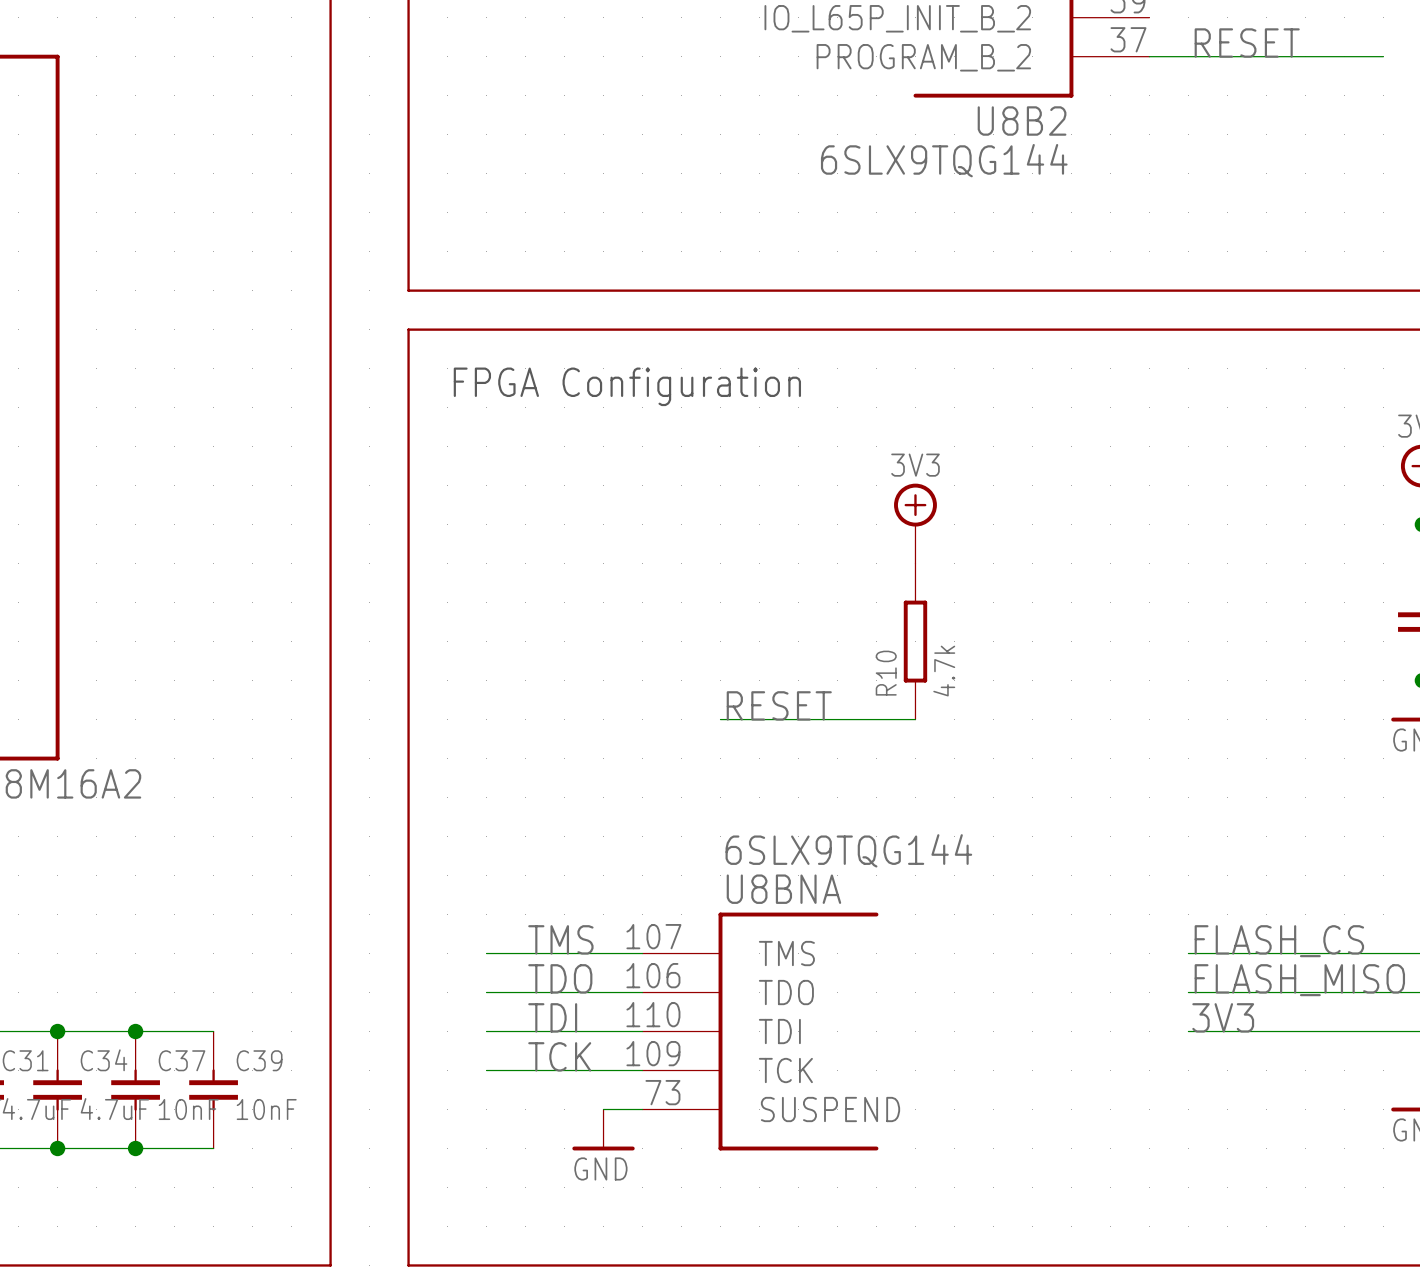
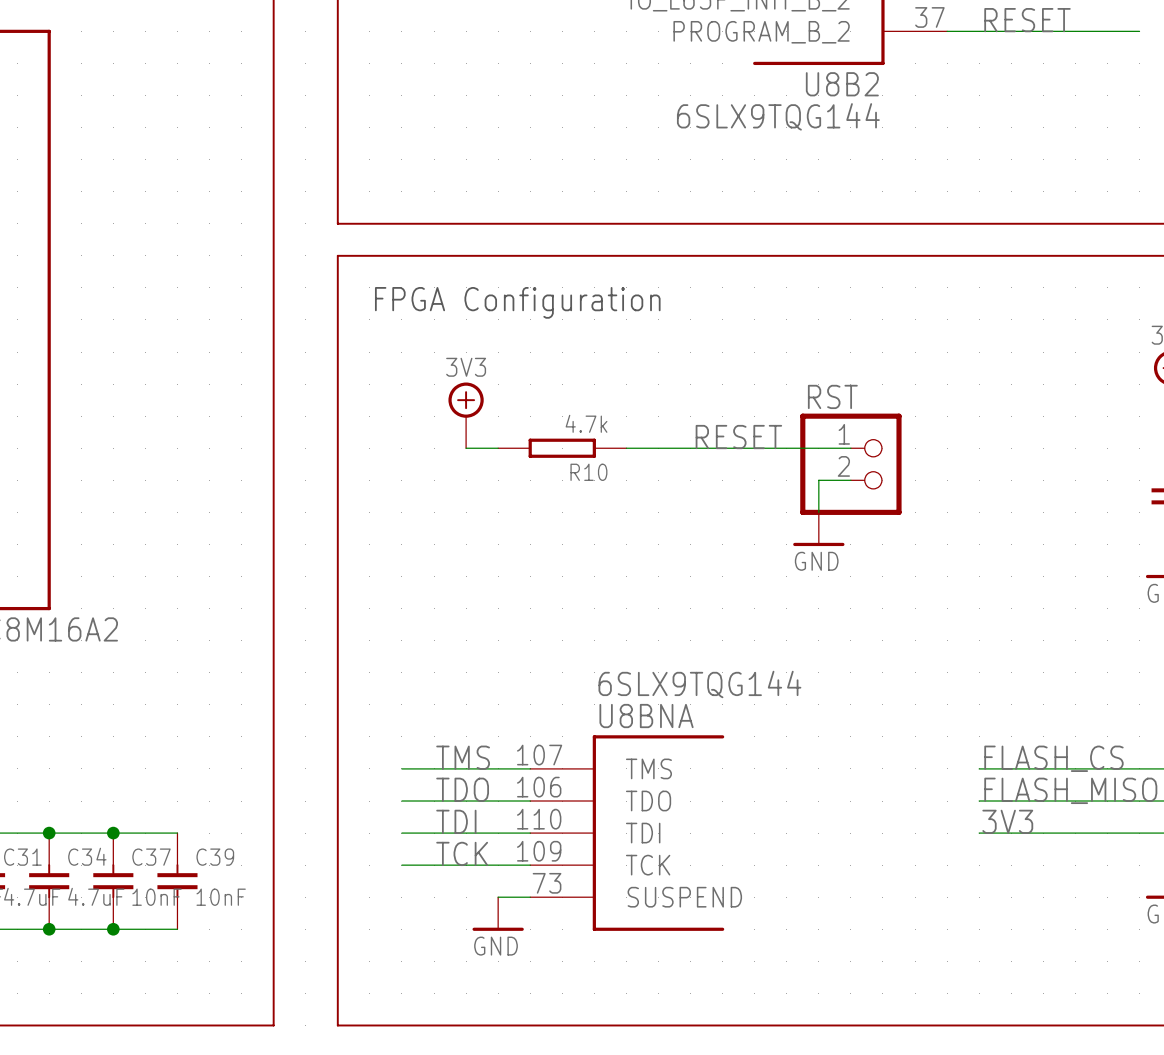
power symbol position: 3V3 (915, 523) -> 3V3 (466, 415)
wire: none -> (466, 448) (498, 448)
wire: none -> (626, 448) (850, 448)
RST: none -> (850, 464)
wire: none -> (850, 480) (818, 480) (818, 512)
R10 rotation: 0° (915, 641) -> 90° clockwise (562, 448)
R10 position: (915, 641) -> (562, 448)
power symbol: none -> GND (818, 529)
R10 value position: 4.7k (944, 671) -> 4.7k (586, 423)
R10 name position: R10 (886, 673) -> R10 (588, 472)
label position: RESET (779, 705) -> RESET (738, 437)
wire: (720, 719) (915, 719) -> none

